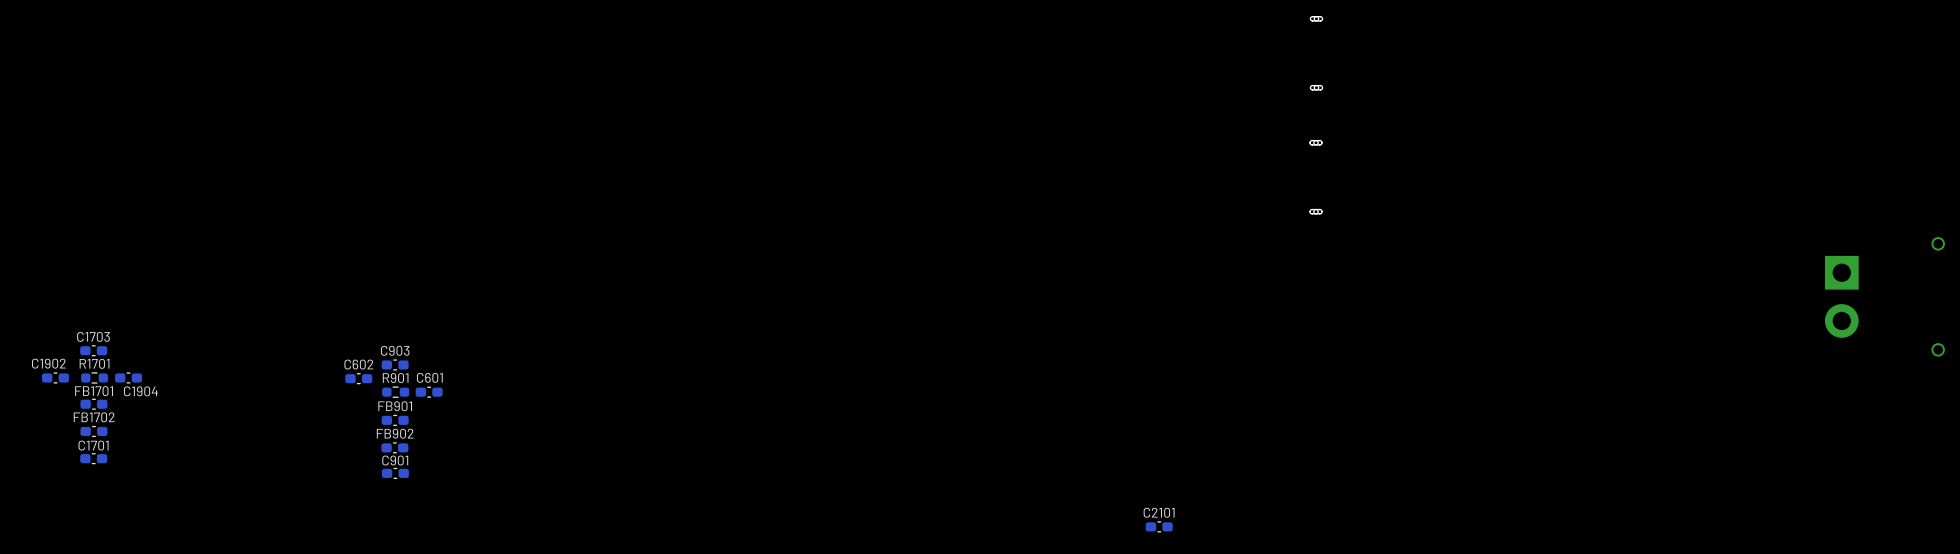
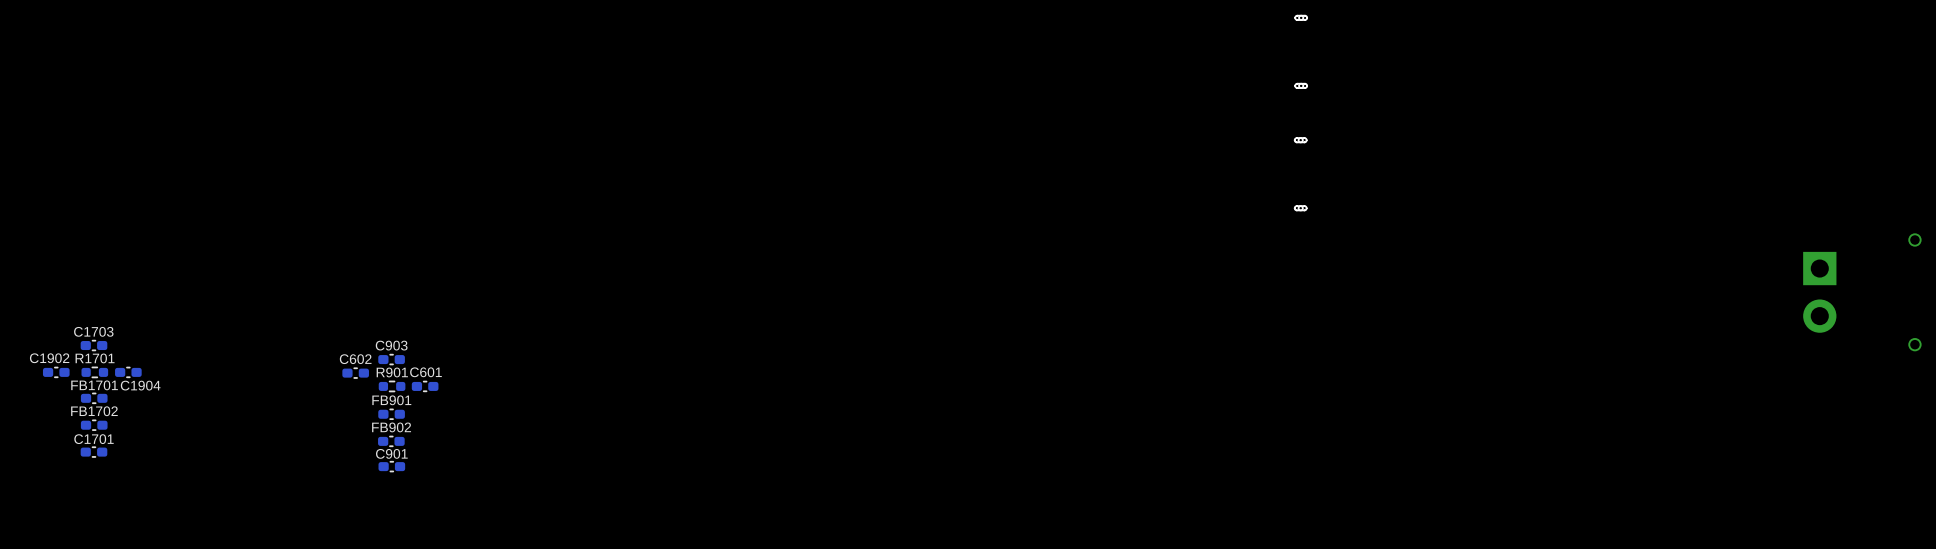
C2101: (1159, 526) -> none

